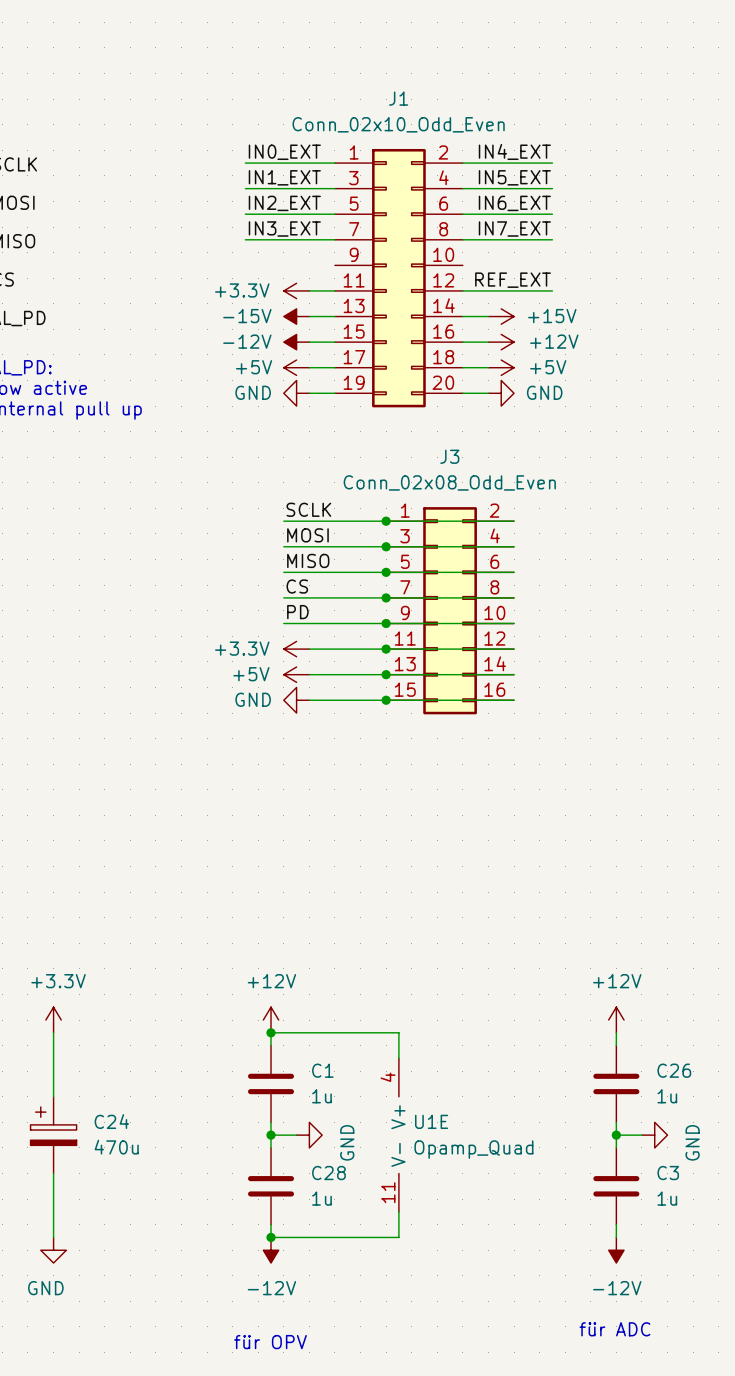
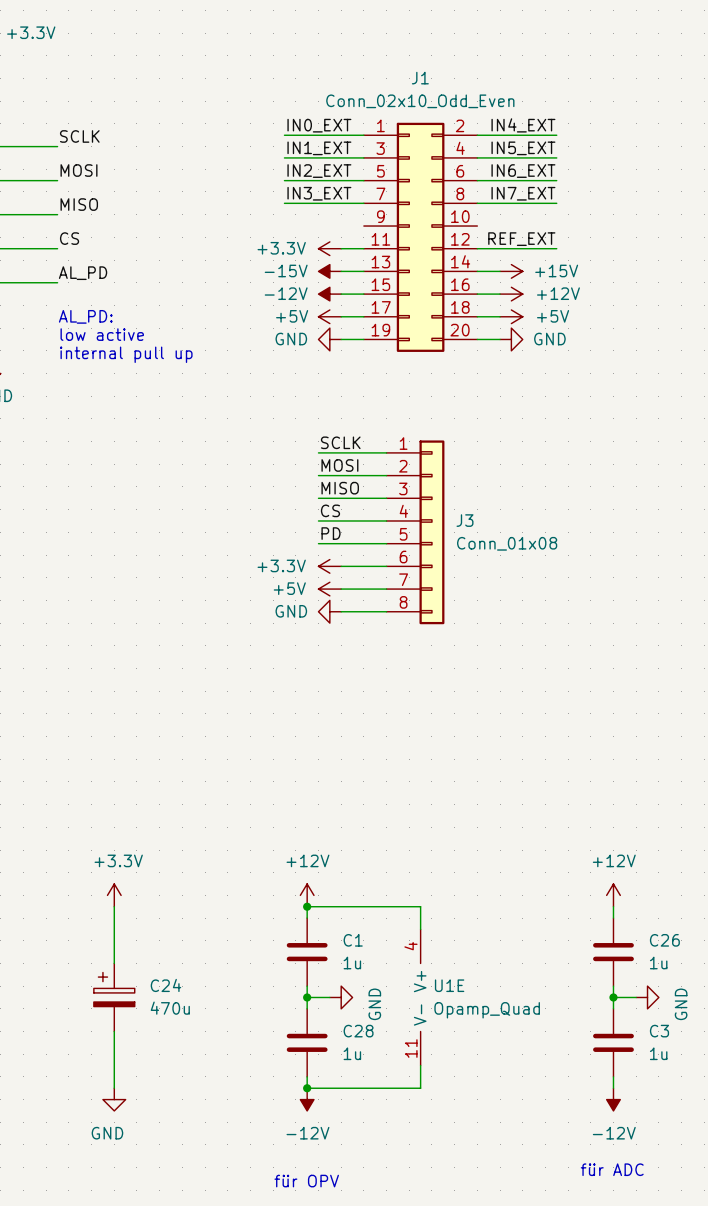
J3 name position: J3 (449, 456) -> J3 (464, 520)
J3 value: Conn_02x08_Odd_Even (449, 482) -> Conn_01x08 (507, 543)
J3 symbol: [386, 507, 515, 715] -> [386, 440, 445, 625]
wire: (360, 521) (514, 521) -> none
junction: (386, 521) -> none
wire: (360, 546) (514, 546) -> none
junction: (386, 546) -> none
wire: (360, 572) (514, 572) -> none
junction: (386, 572) -> none
wire: (360, 597) (514, 597) -> none
junction: (386, 597) -> none
junction: (386, 623) -> none
wire: (360, 649) (514, 649) -> none
junction: (386, 649) -> none
wire: (360, 674) (514, 674) -> none
junction: (386, 674) -> none
wire: (360, 700) (514, 700) -> none
junction: (386, 700) -> none

